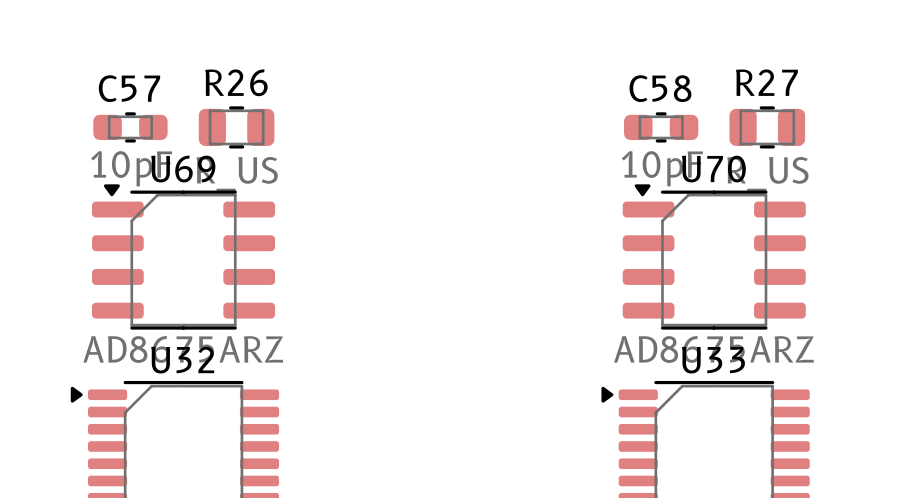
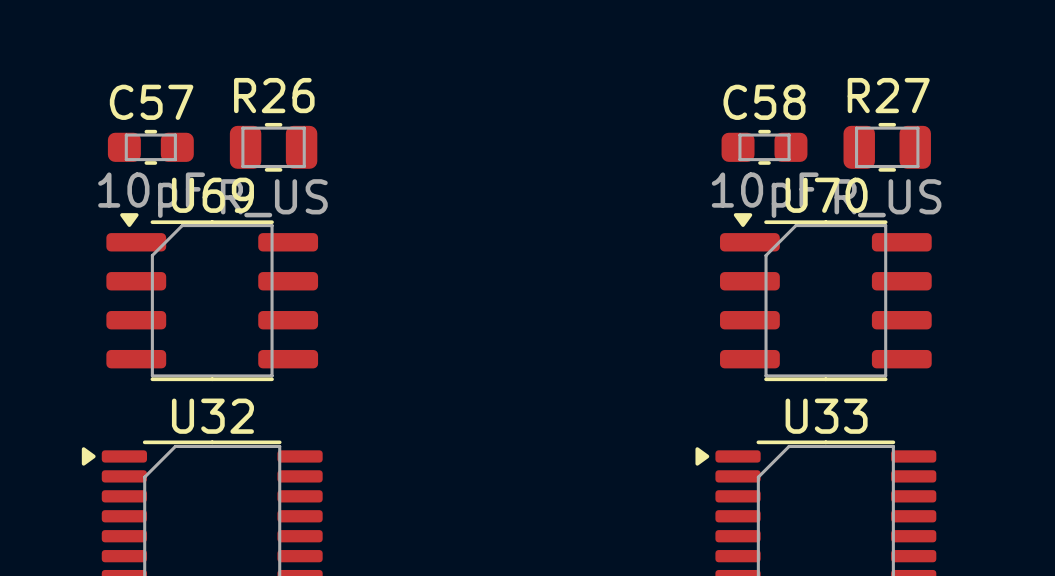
U69 value: AD8675ARZ (183, 349) -> none
U70 value: AD8675ARZ (713, 349) -> none

